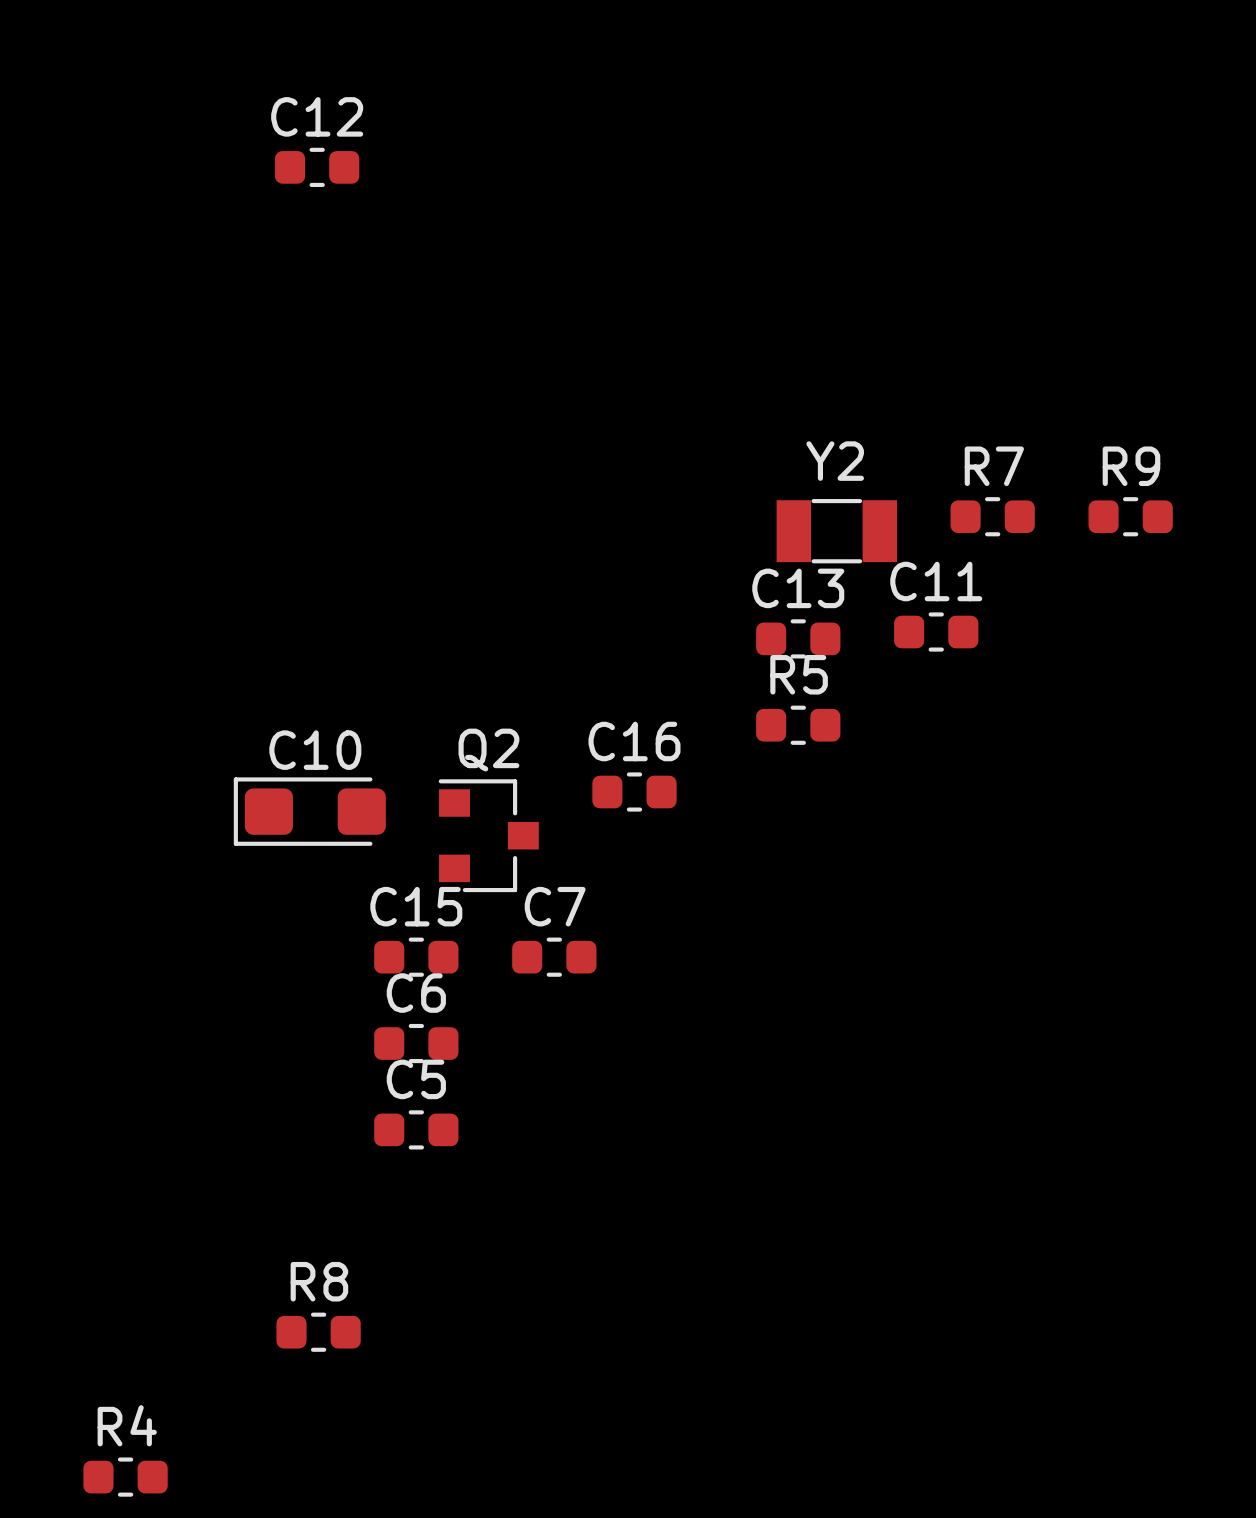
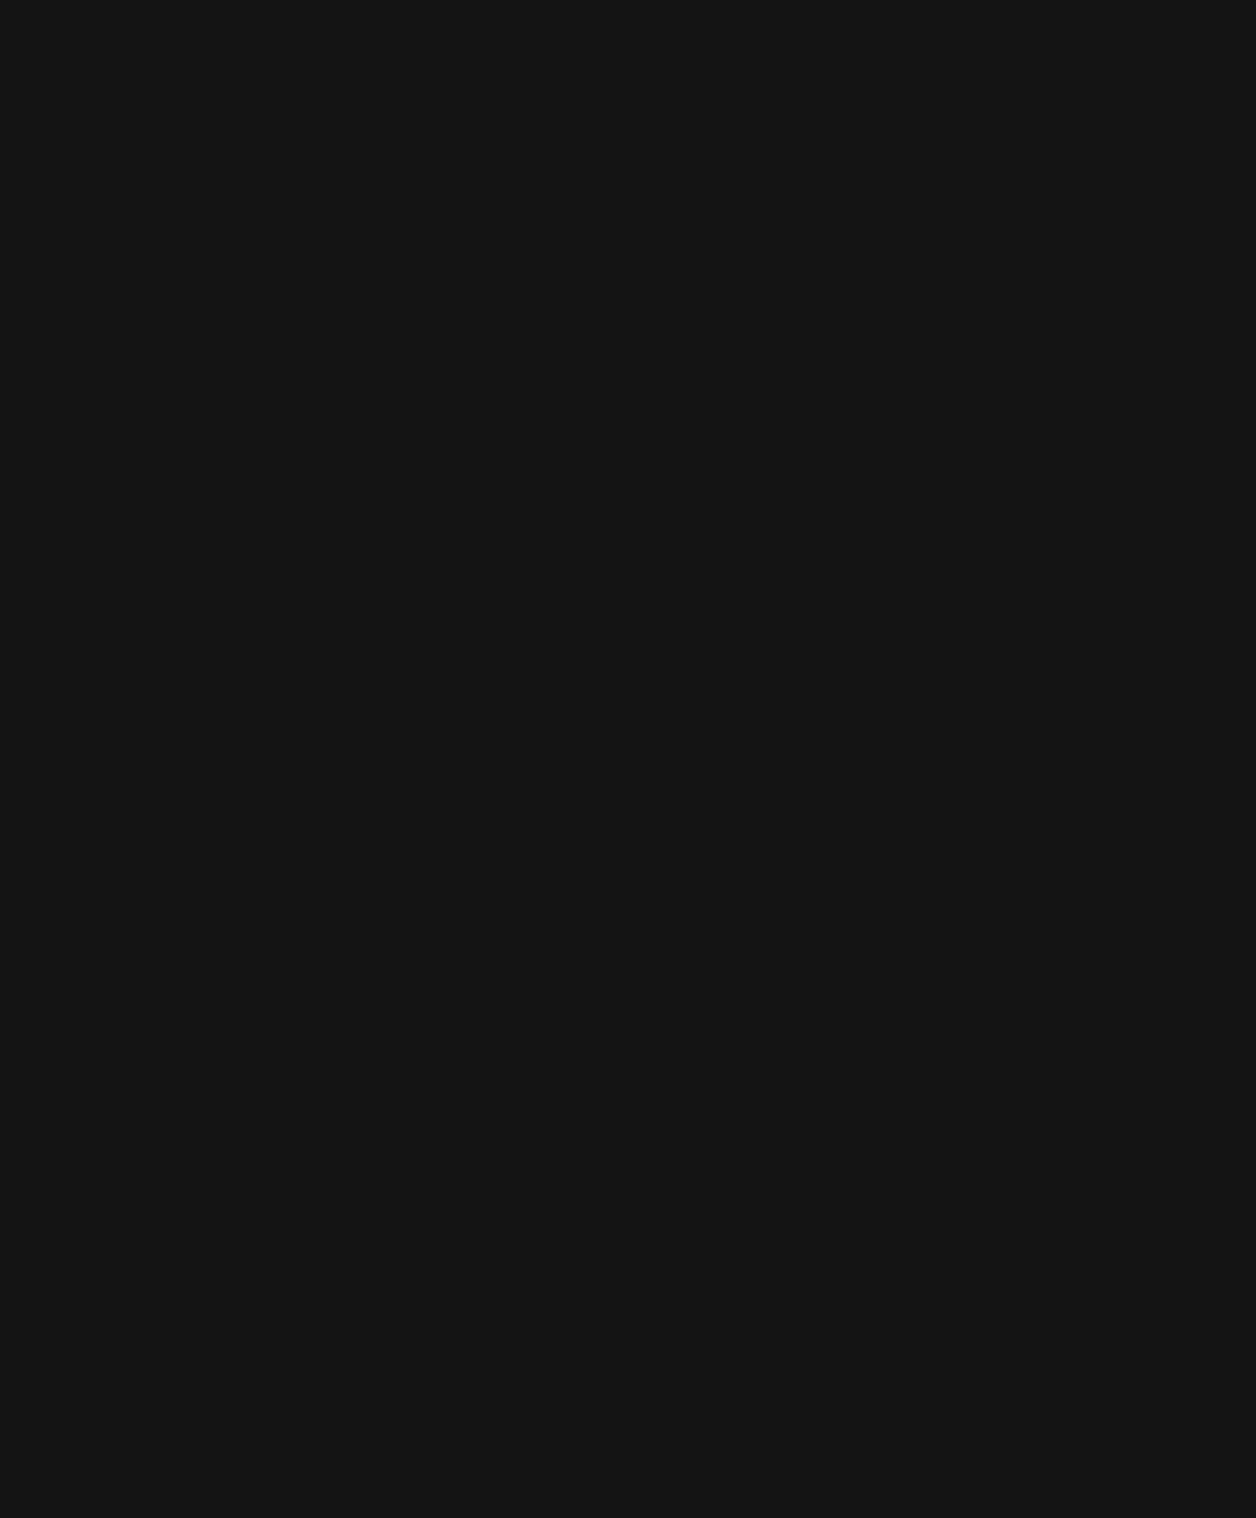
C12: (317, 167) -> none
R7: (992, 516) -> none
R9: (1130, 516) -> none
Y2: (836, 531) -> none
C11: (936, 632) -> none
C13: (798, 638) -> none
R5: (798, 725) -> none
C16: (634, 792) -> none
C10: (309, 811) -> none
Q2: (488, 835) -> none
C15: (416, 957) -> none
C7: (554, 957) -> none
C6: (416, 1043) -> none
C5: (416, 1129) -> none
R8: (318, 1332) -> none
R4: (125, 1477) -> none

